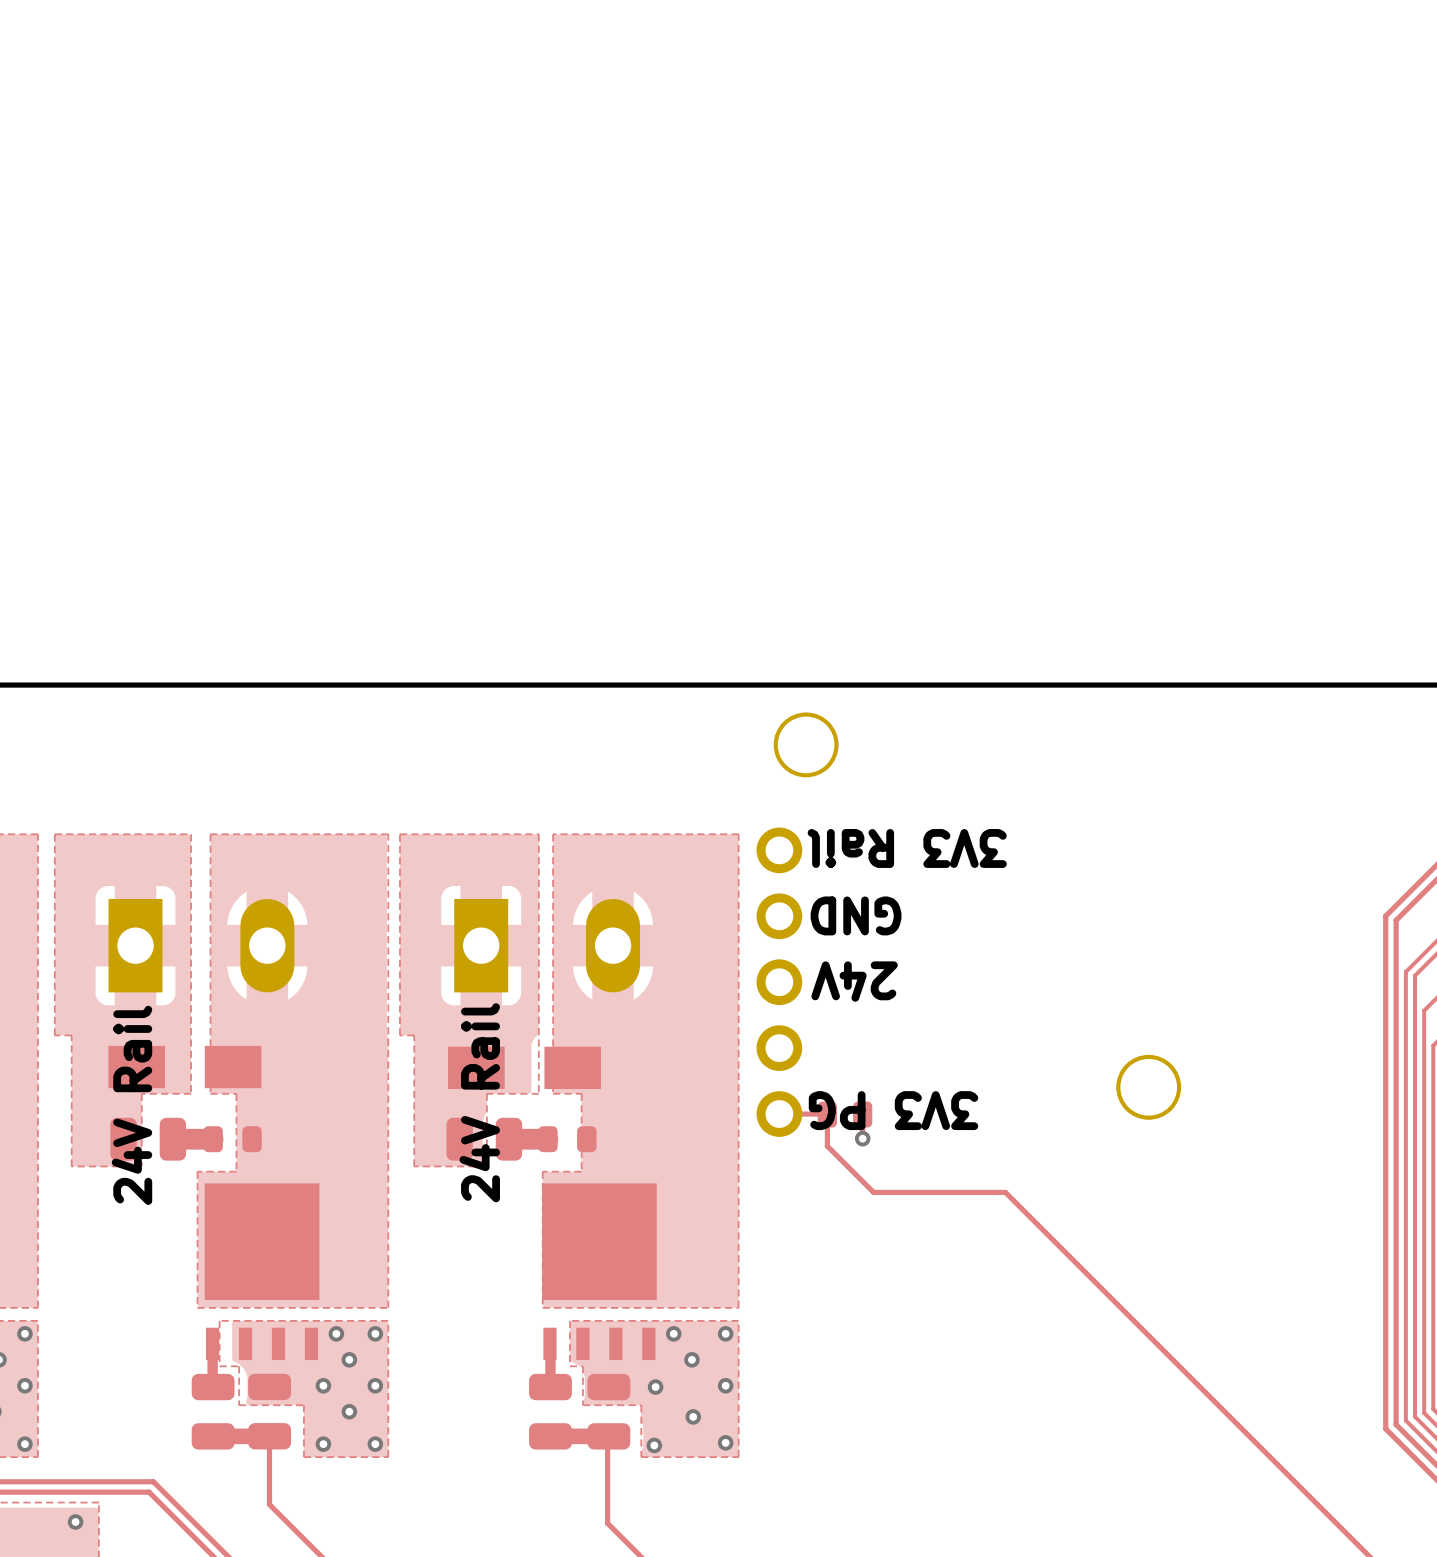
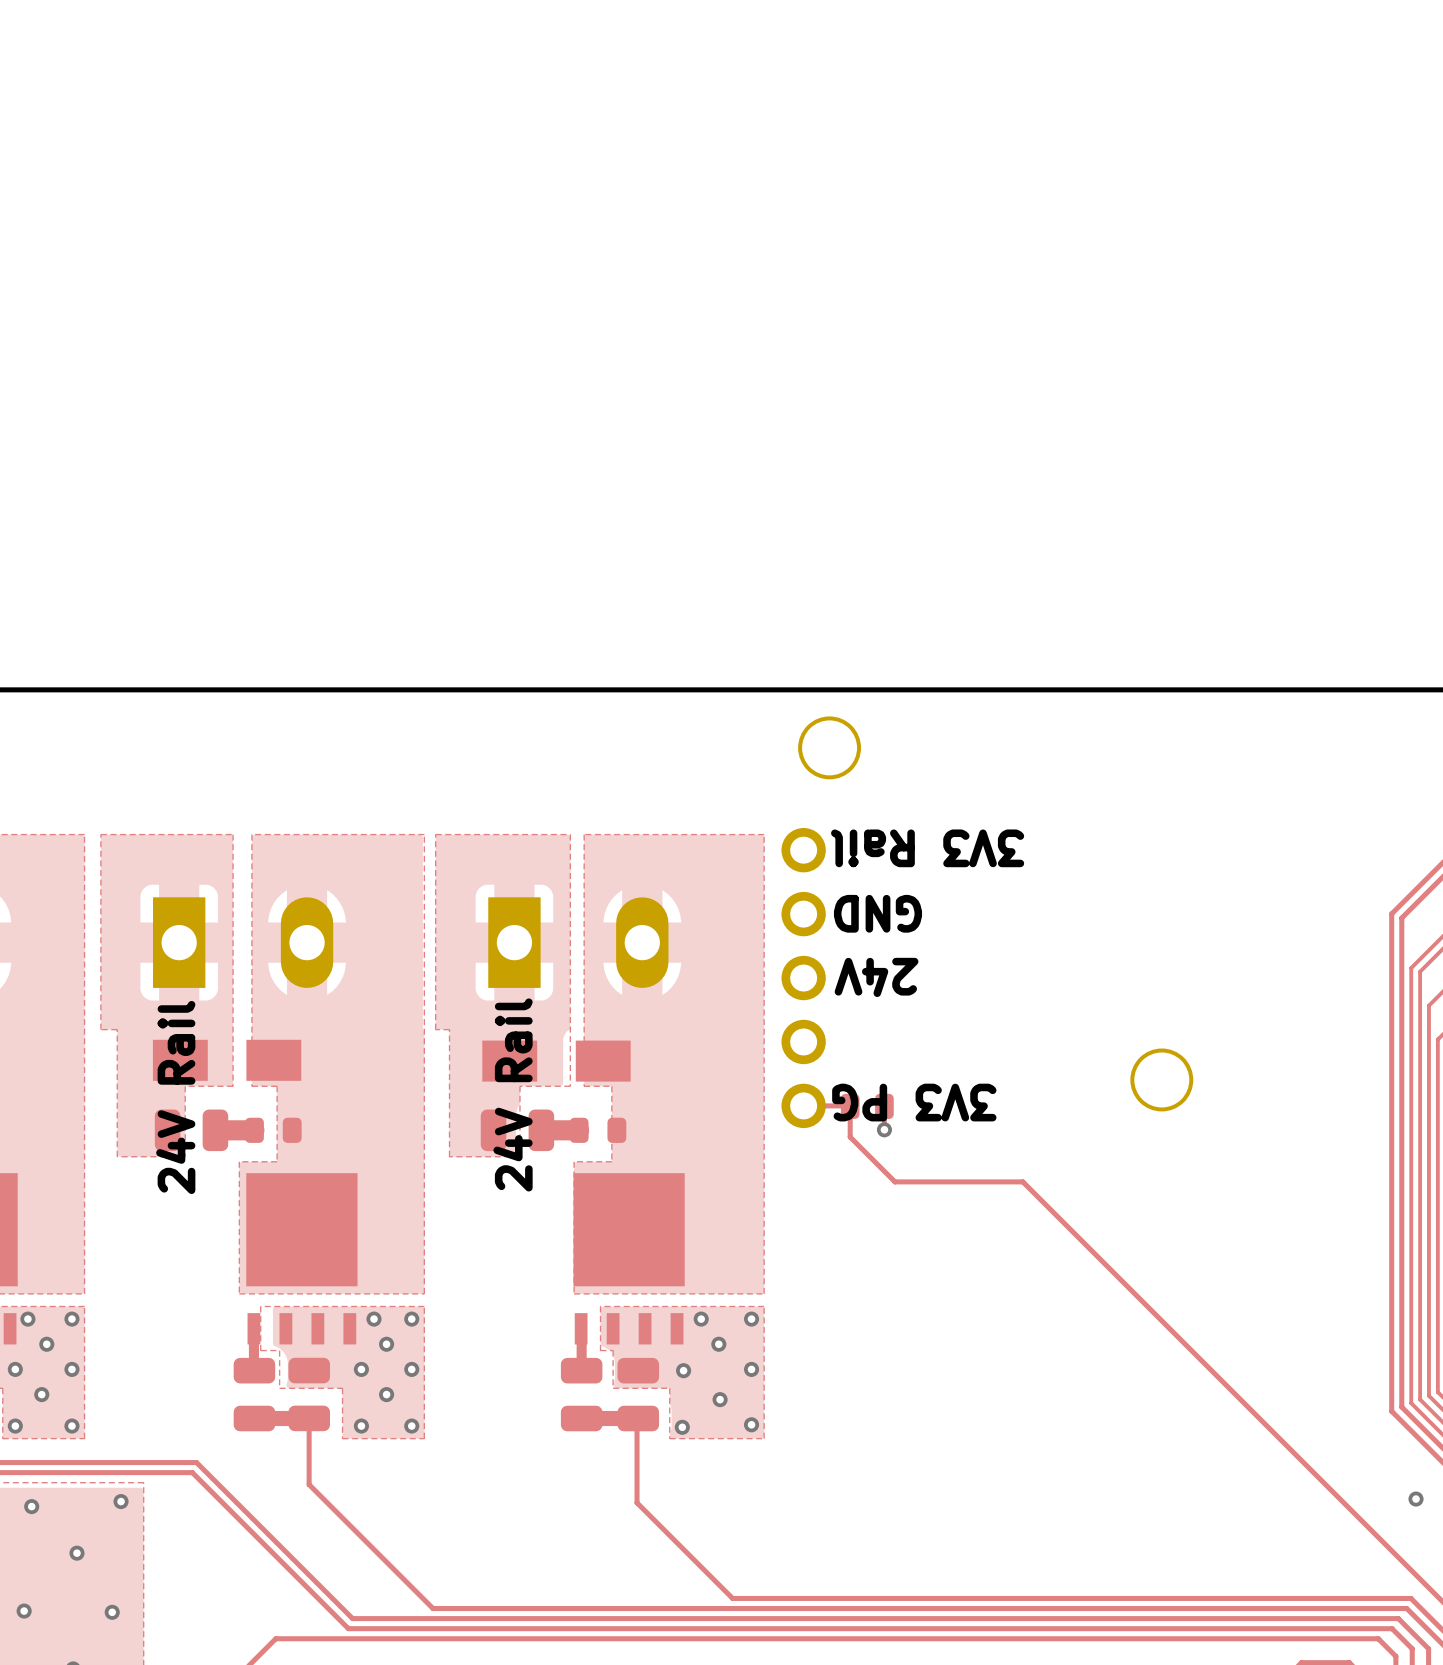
via: none -> (1416, 1499)

